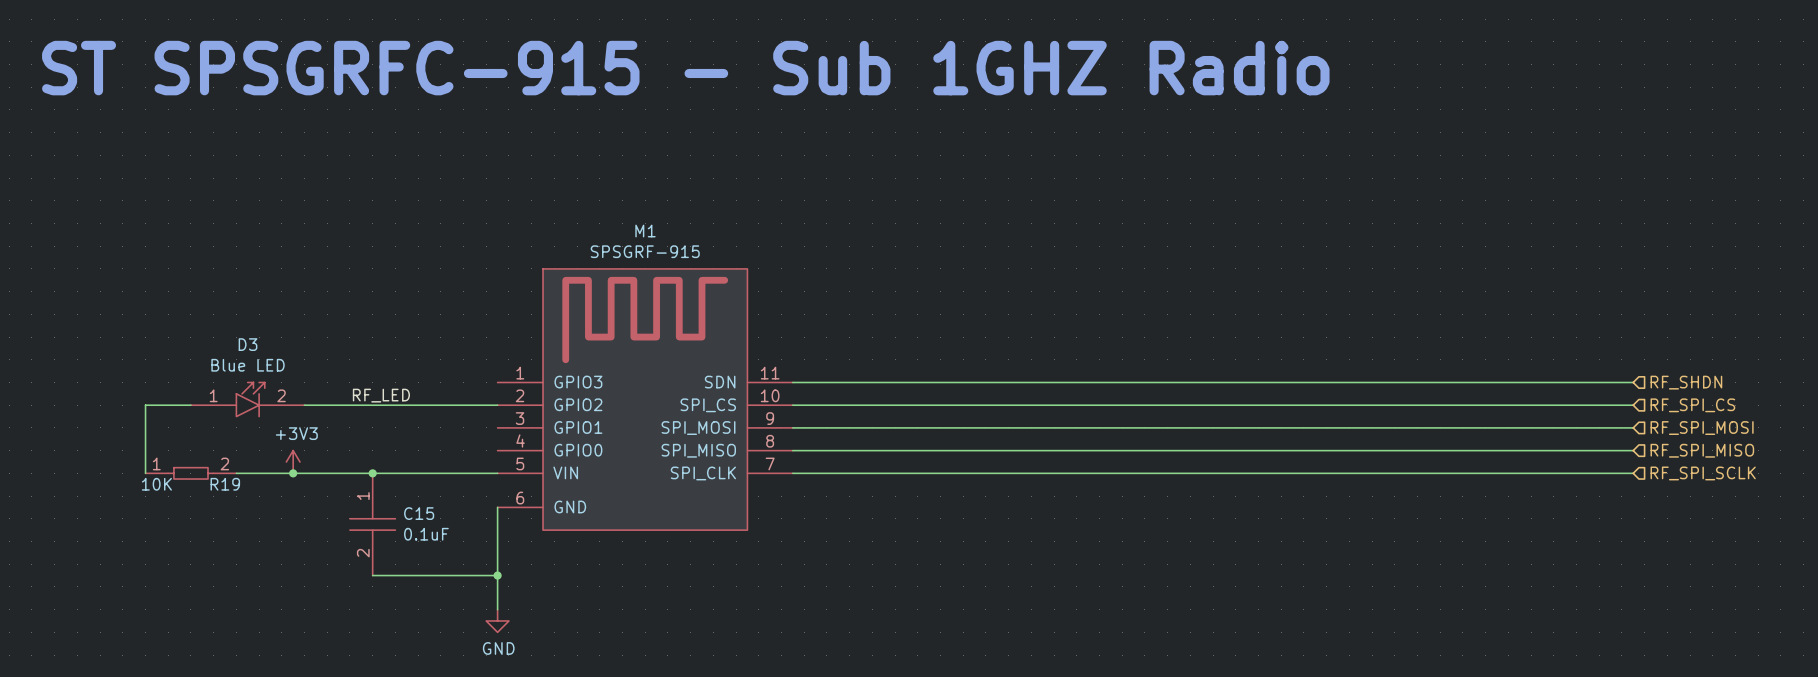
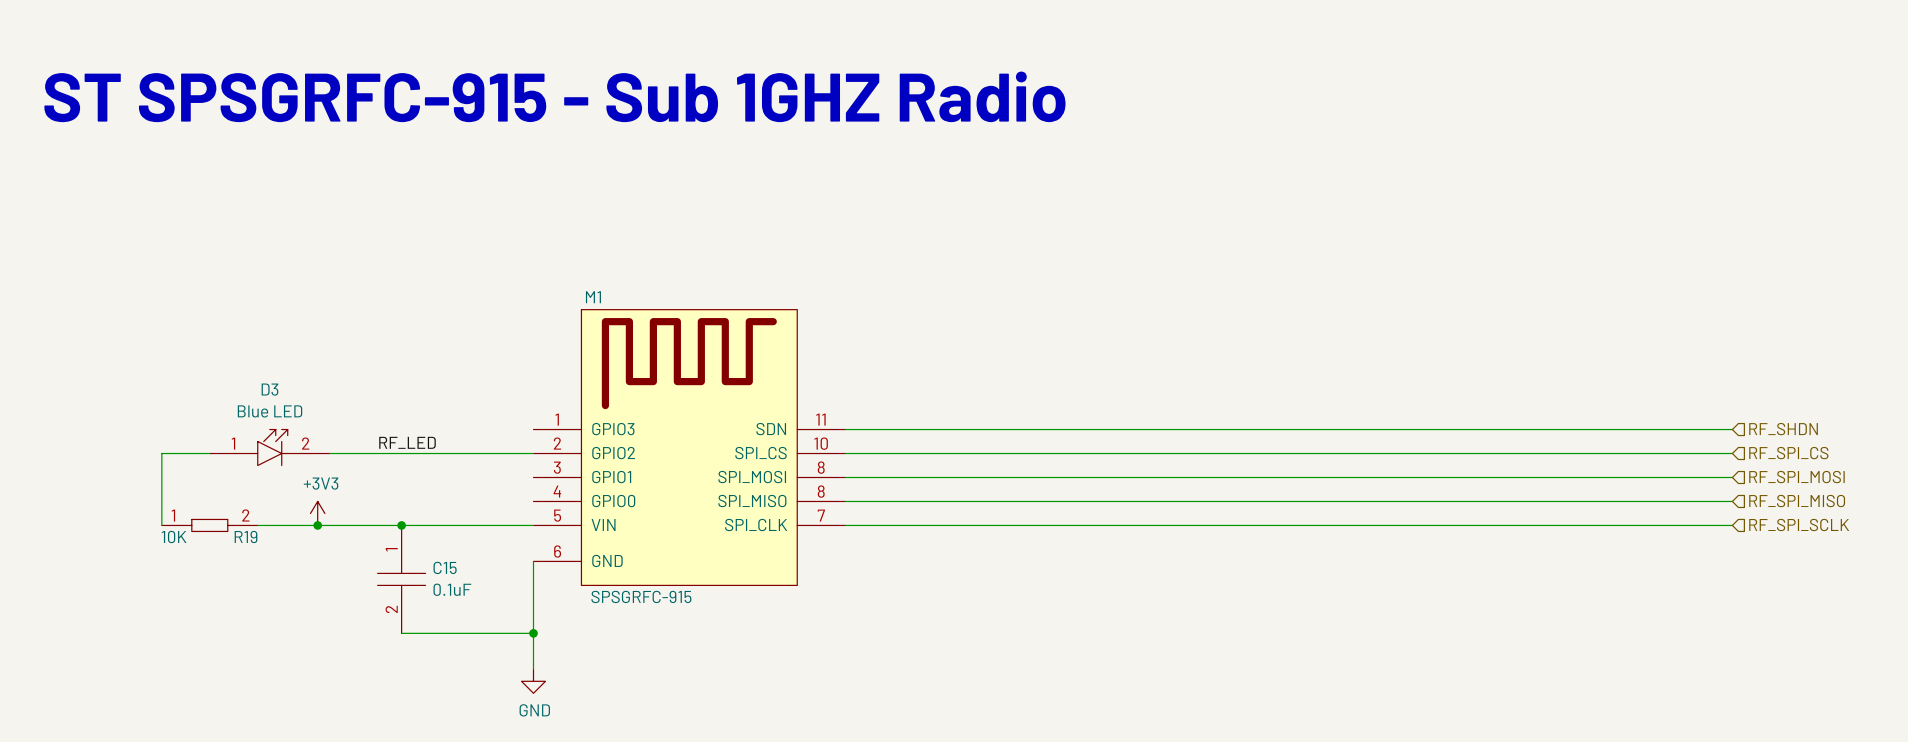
M1 name position: M1 (645, 231) -> M1 (593, 297)
M1 text: SPSGRF-915 (645, 251) -> SPSGRFC-915 (641, 596)
M1 pin number: 9 (770, 418) -> 8 (821, 467)

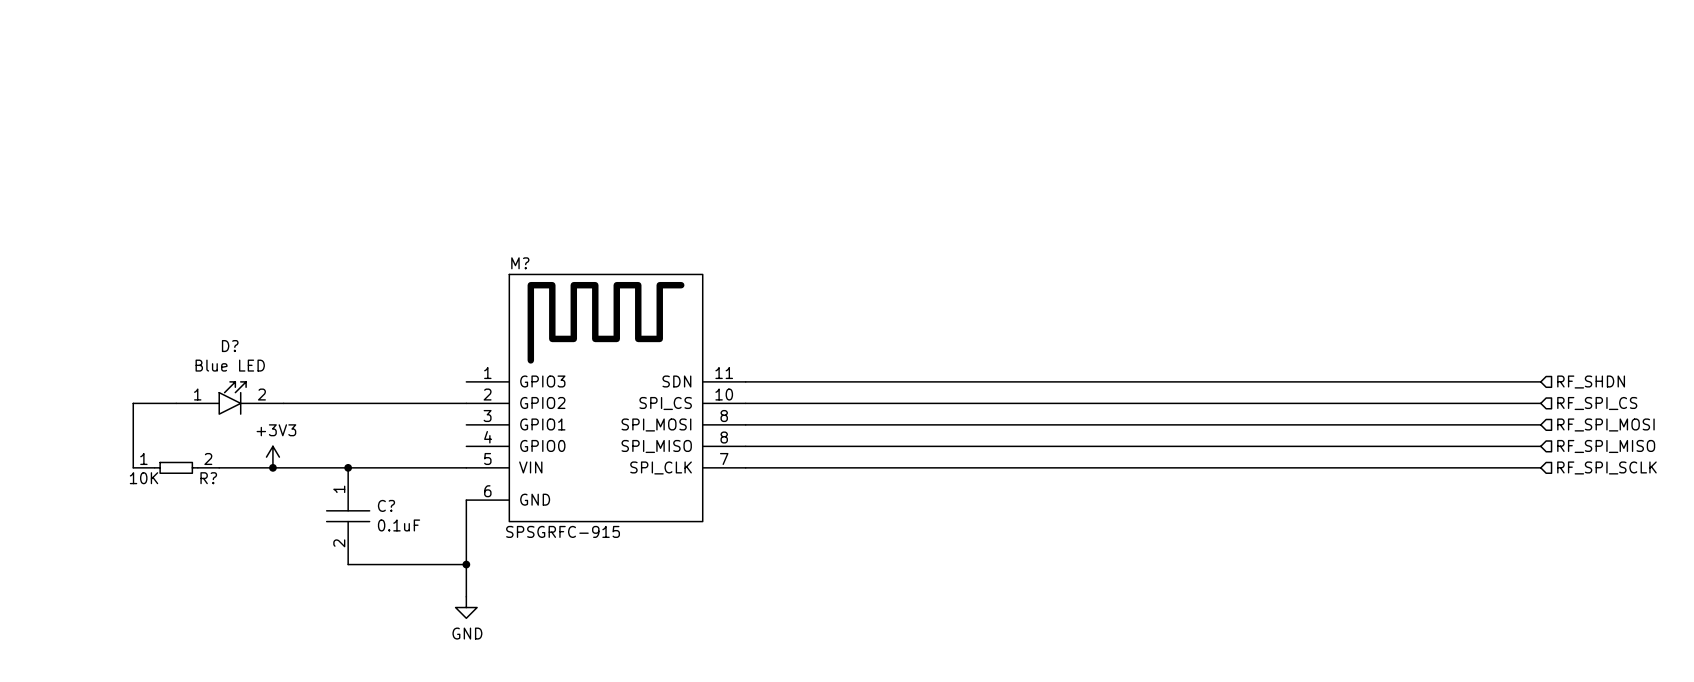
text: ST SPSGRFC-915 - Sub 1GHZ Radio (554, 96) -> none
M1 name: M1 (593, 297) -> M? (520, 263)
D3 name: D3 (269, 389) -> D? (230, 346)
label: RF_LED (407, 442) -> none
R19 name: R19 (246, 537) -> R? (208, 478)
C15 name: C15 (445, 567) -> C? (386, 505)

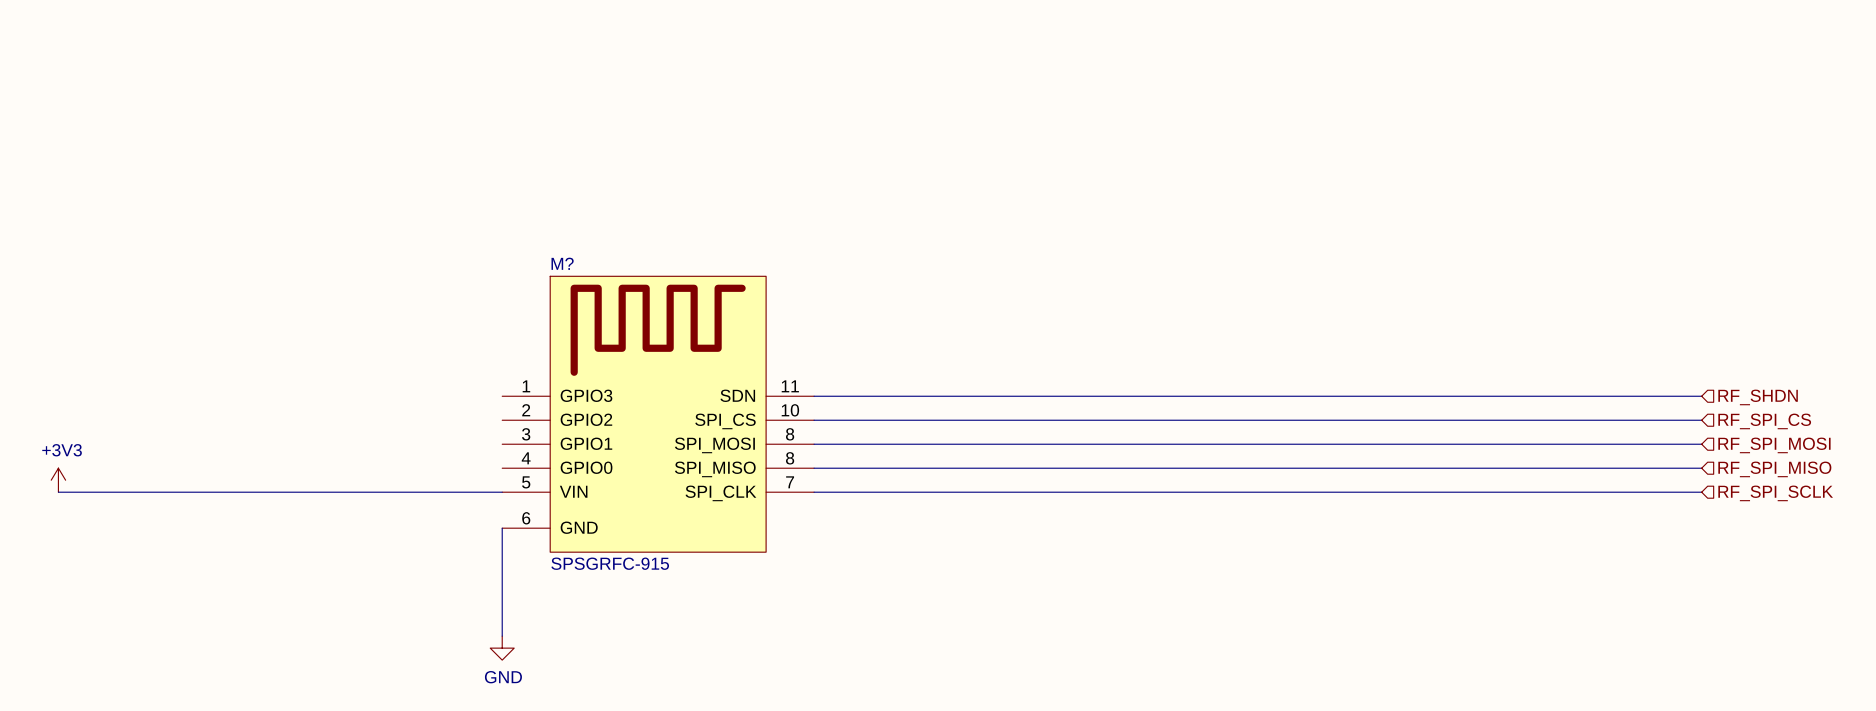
D?: (229, 398) -> none
wire: (176, 403) (133, 403) (133, 467) -> none
wire: (283, 403) (466, 403) -> none
power symbol position: +3V3 (272, 457) -> +3V3 (58, 480)
wire: none -> (58, 492) (226, 492)
R?: (176, 467) -> none
junction: (272, 467) -> none
junction: (348, 467) -> none
C?: (348, 516) -> none
wire: (348, 564) (466, 564) -> none
junction: (466, 564) -> none

